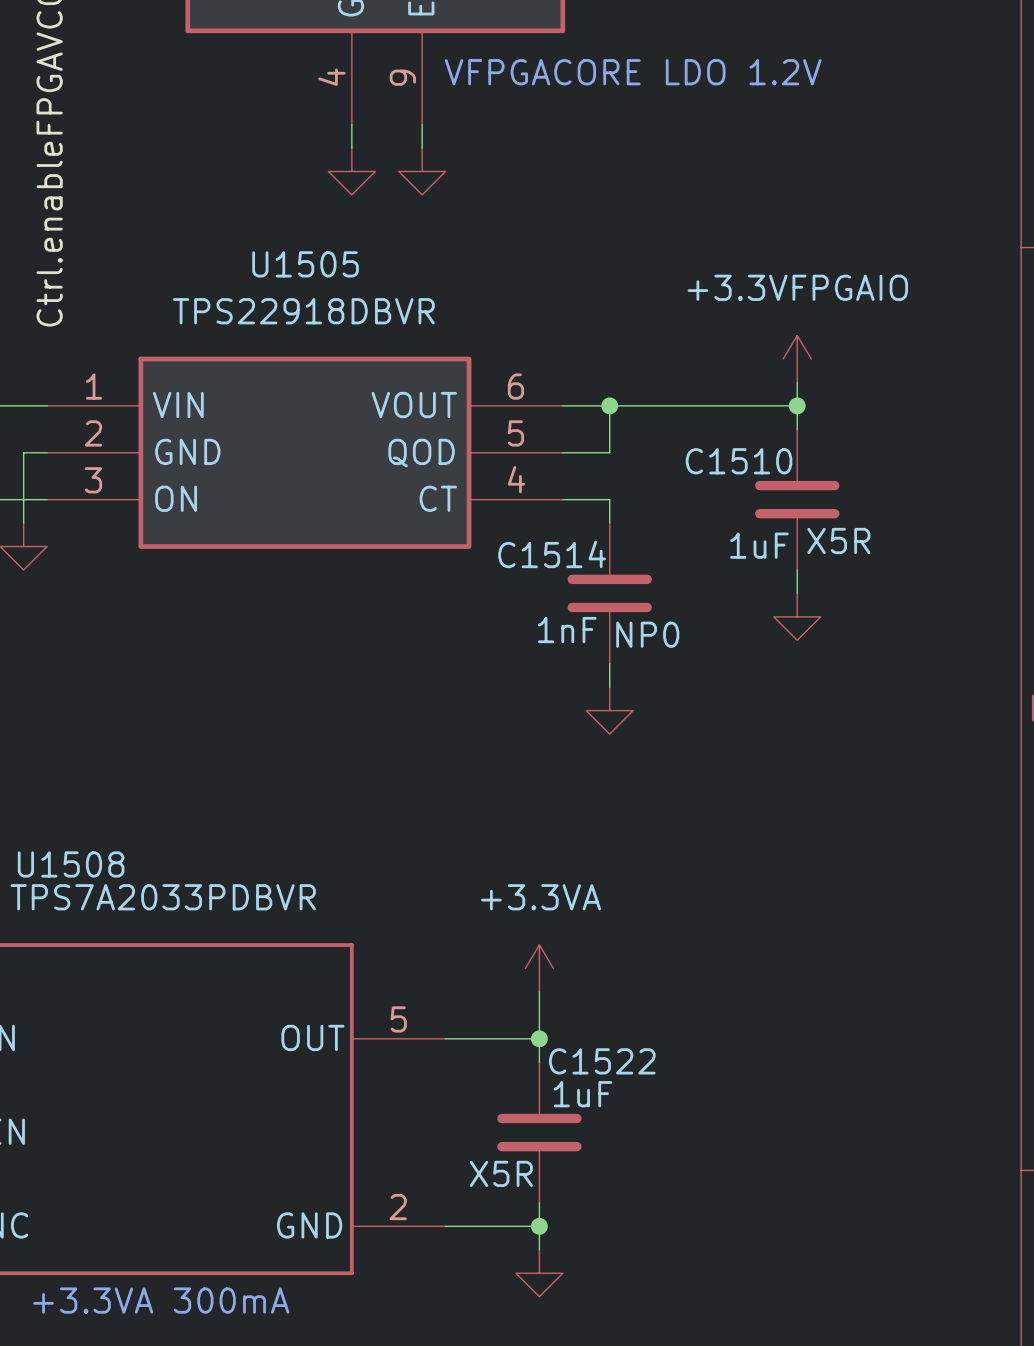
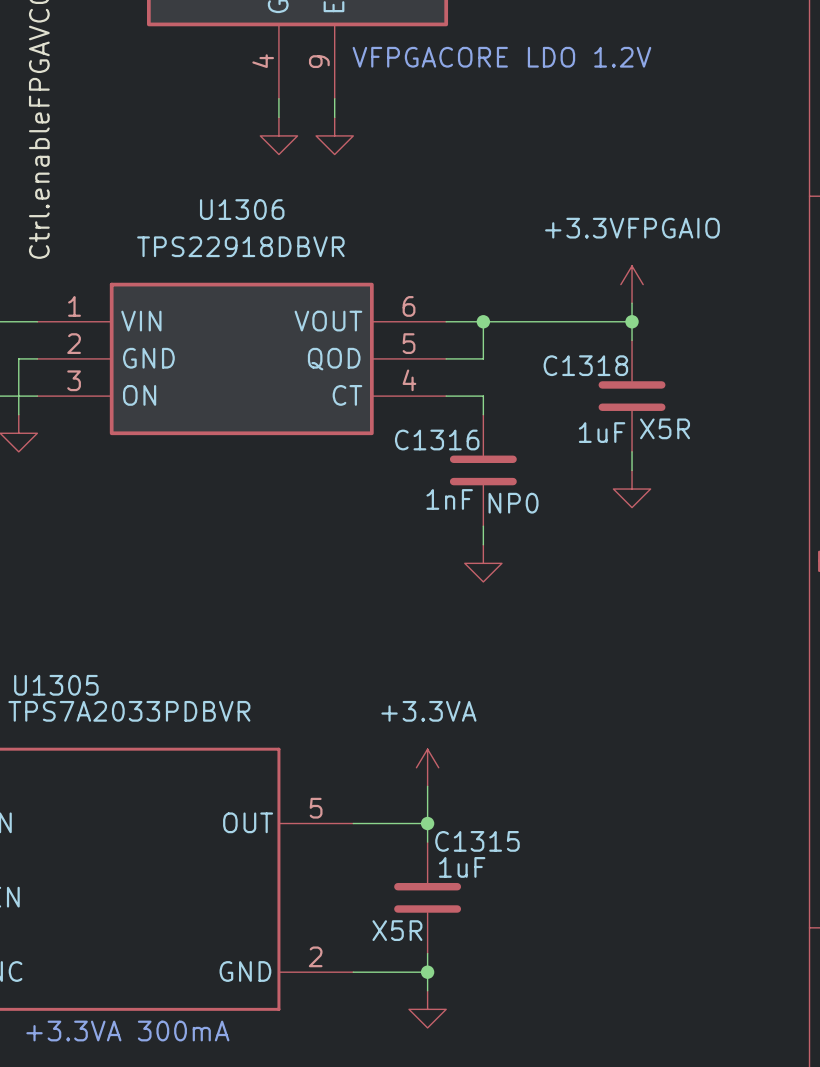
U1505 name: U1505 (305, 264) -> U1306 (242, 209)
C1510 name: C1510 (739, 461) -> C1318 (585, 365)
C1514 name: C1514 (552, 554) -> C1316 (437, 440)
U1508 name: U1508 (71, 864) -> U1305 (56, 685)
C1522 name: C1522 (602, 1061) -> C1315 (477, 841)

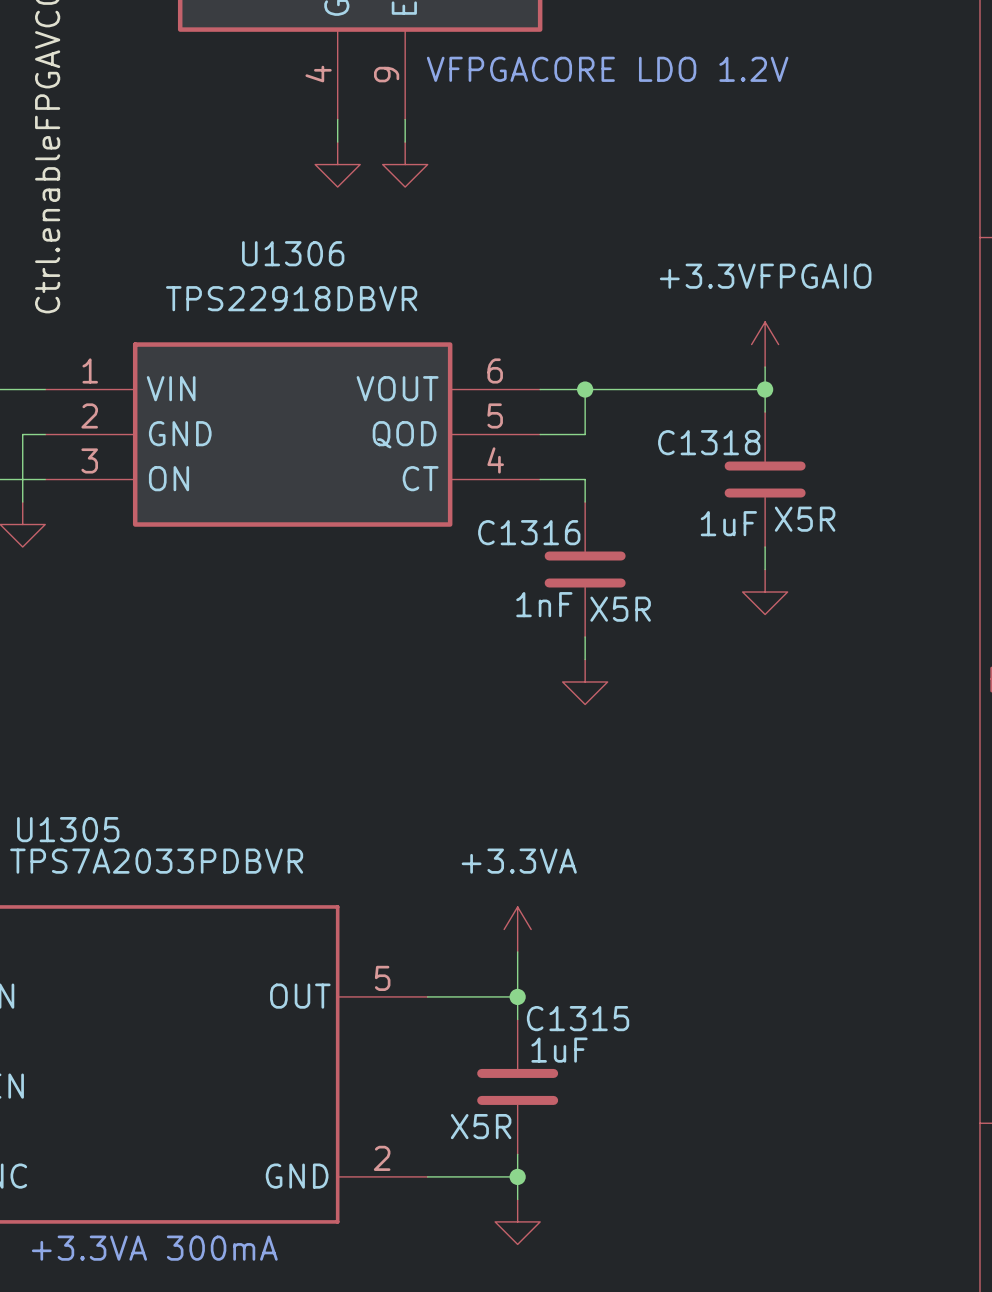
C1316 text: NP0 (513, 503) -> X5R (620, 609)

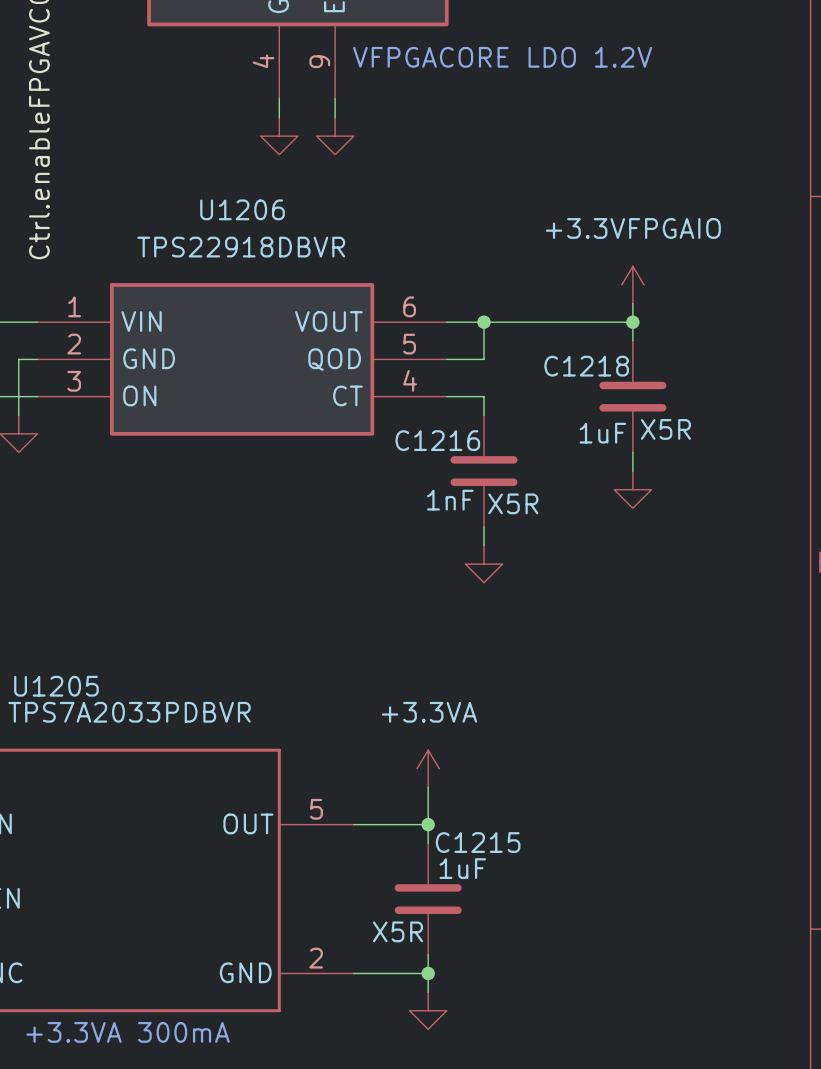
U1306 name: U1306 (293, 253) -> U1206 (242, 209)
C1318 name: C1318 (709, 442) -> C1218 (586, 366)
C1316 name: C1316 (529, 532) -> C1216 (437, 440)
U1305 name: U1305 (68, 829) -> U1205 (56, 686)
C1315 name: C1315 (578, 1018) -> C1215 (478, 842)

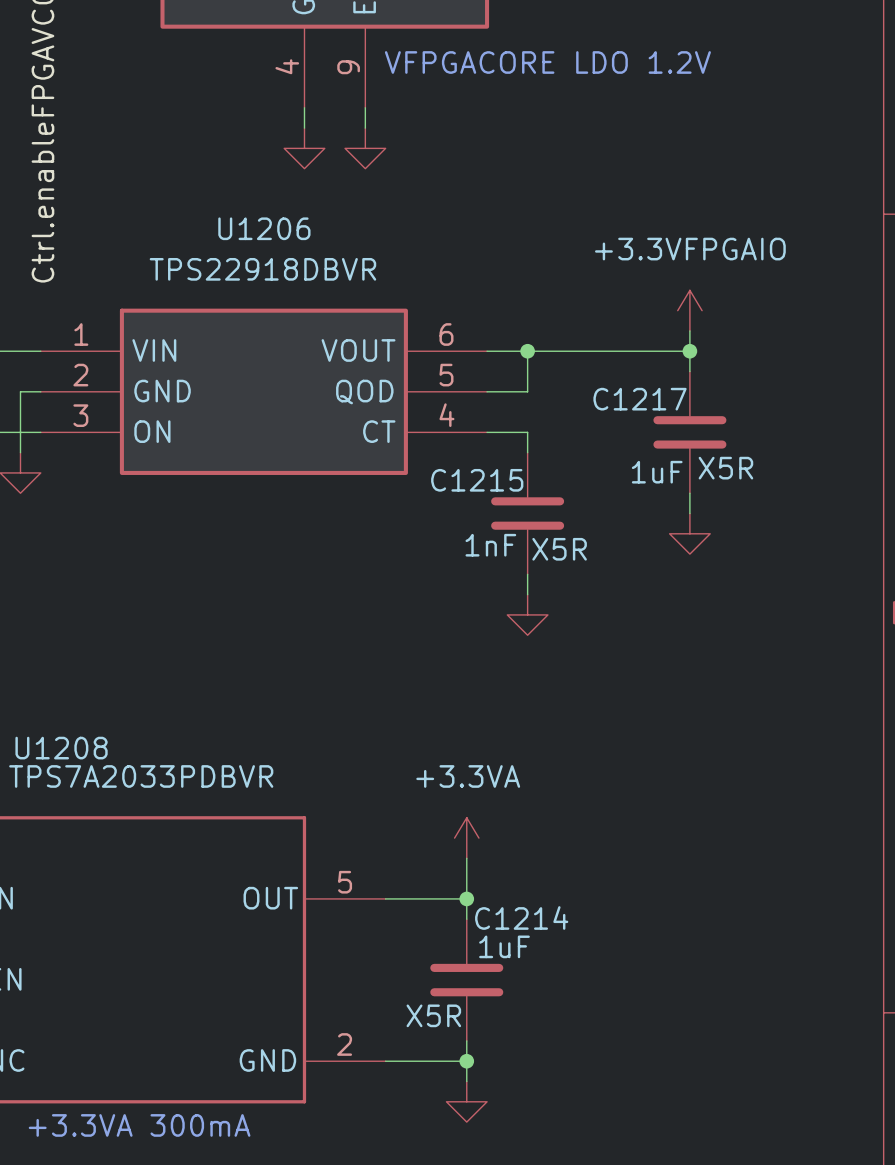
C1218 name: C1218 (586, 366) -> C1217 (640, 399)
C1216 name: C1216 (437, 440) -> C1215 (477, 480)
U1205 name: U1205 (56, 686) -> U1208 (61, 748)
C1215 name: C1215 (478, 842) -> C1214 (521, 917)

